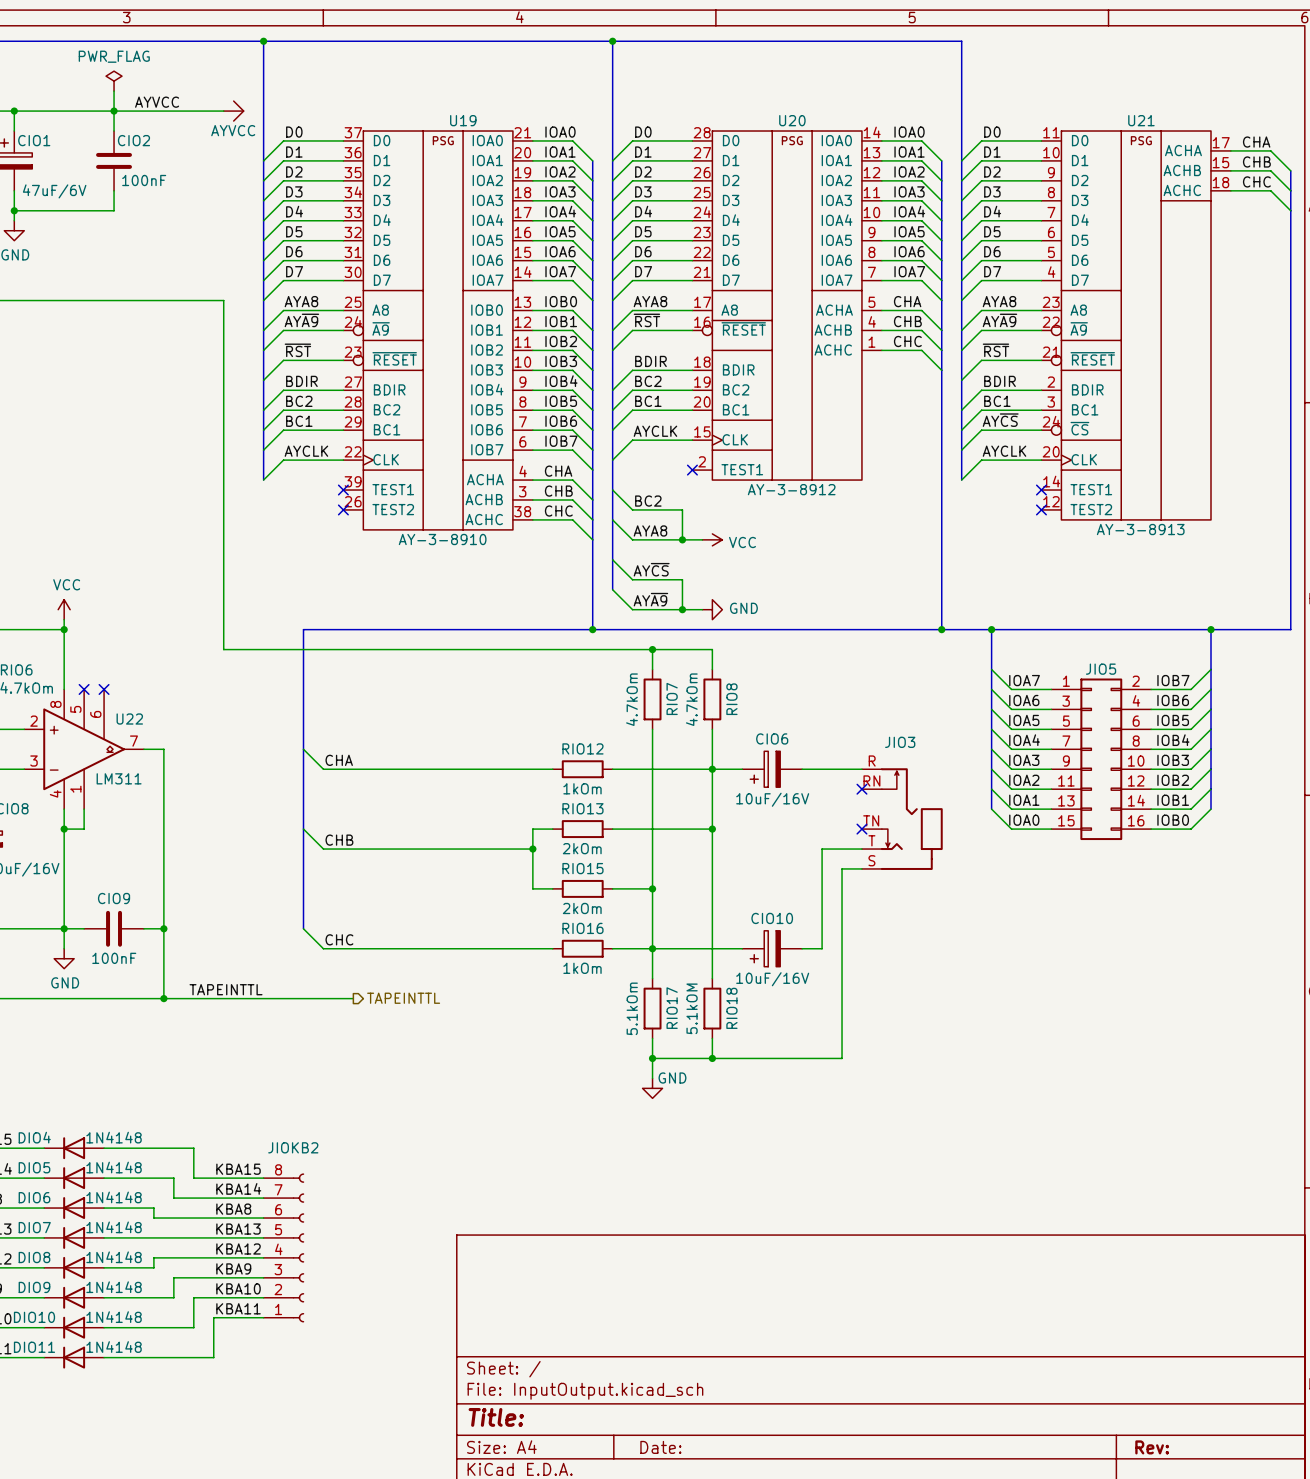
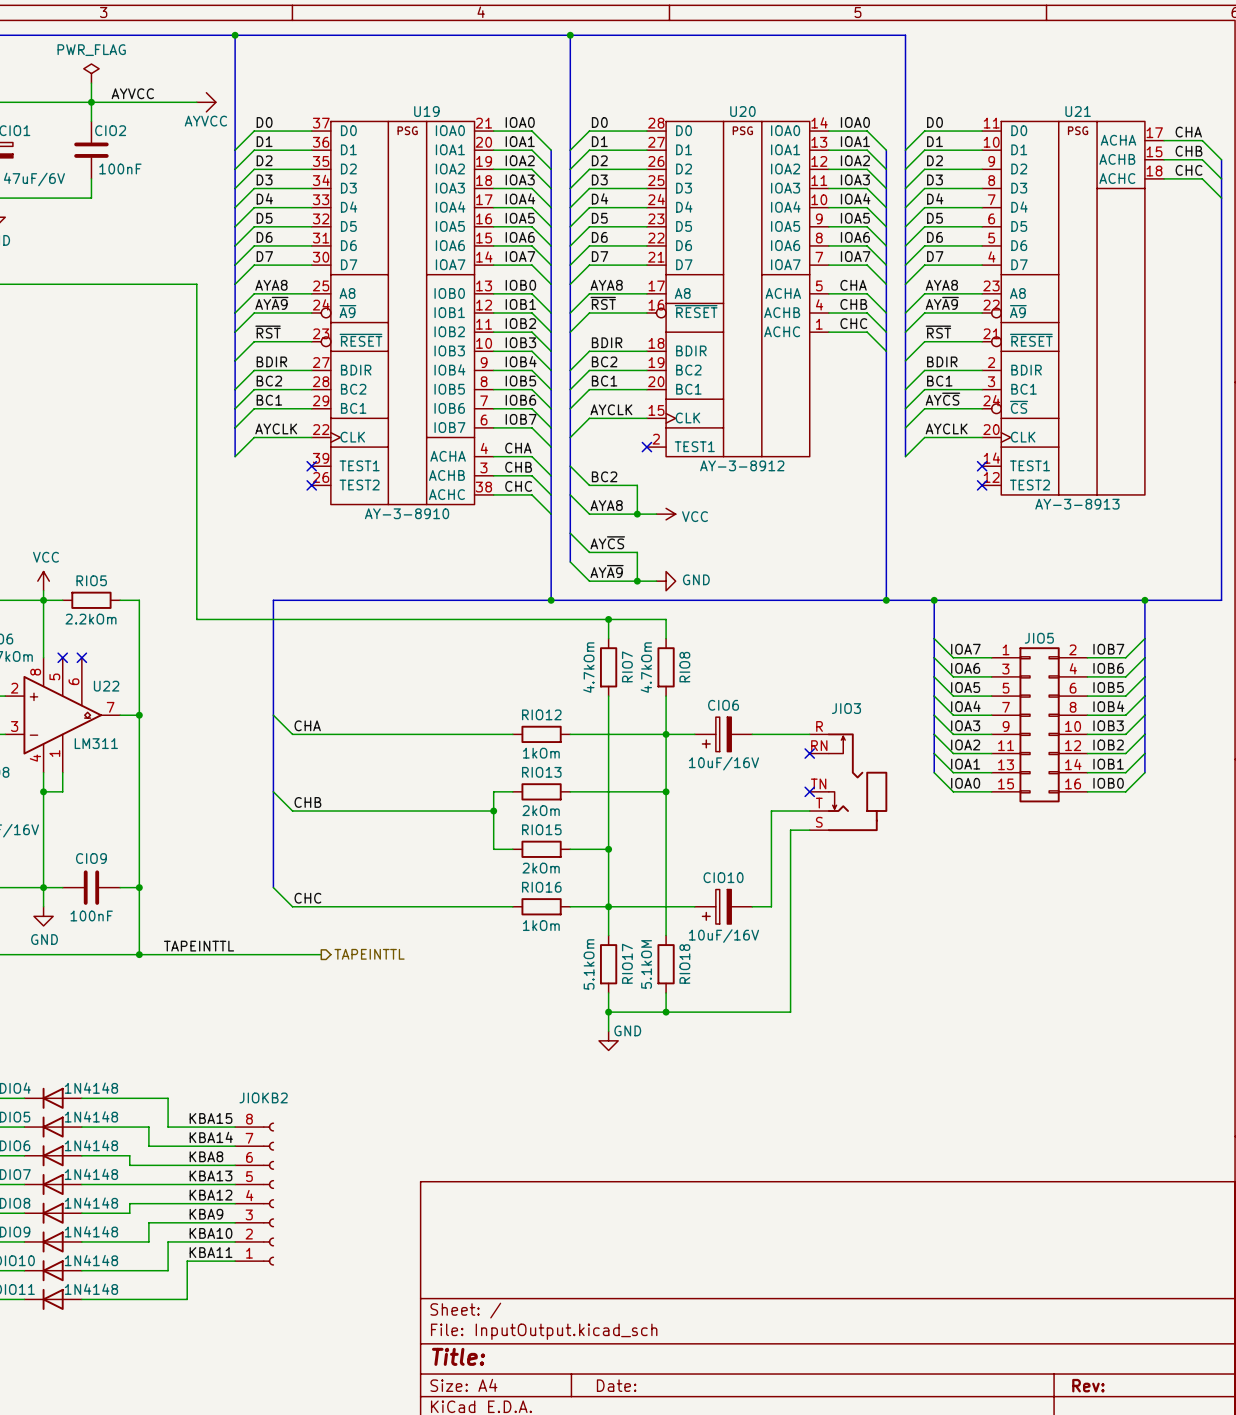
wire: none -> (43, 600) (62, 600)
RIO5: none -> 2.2kOm (91, 600)
wire: none -> (120, 600) (139, 600) (139, 715)
junction: none -> (139, 715)

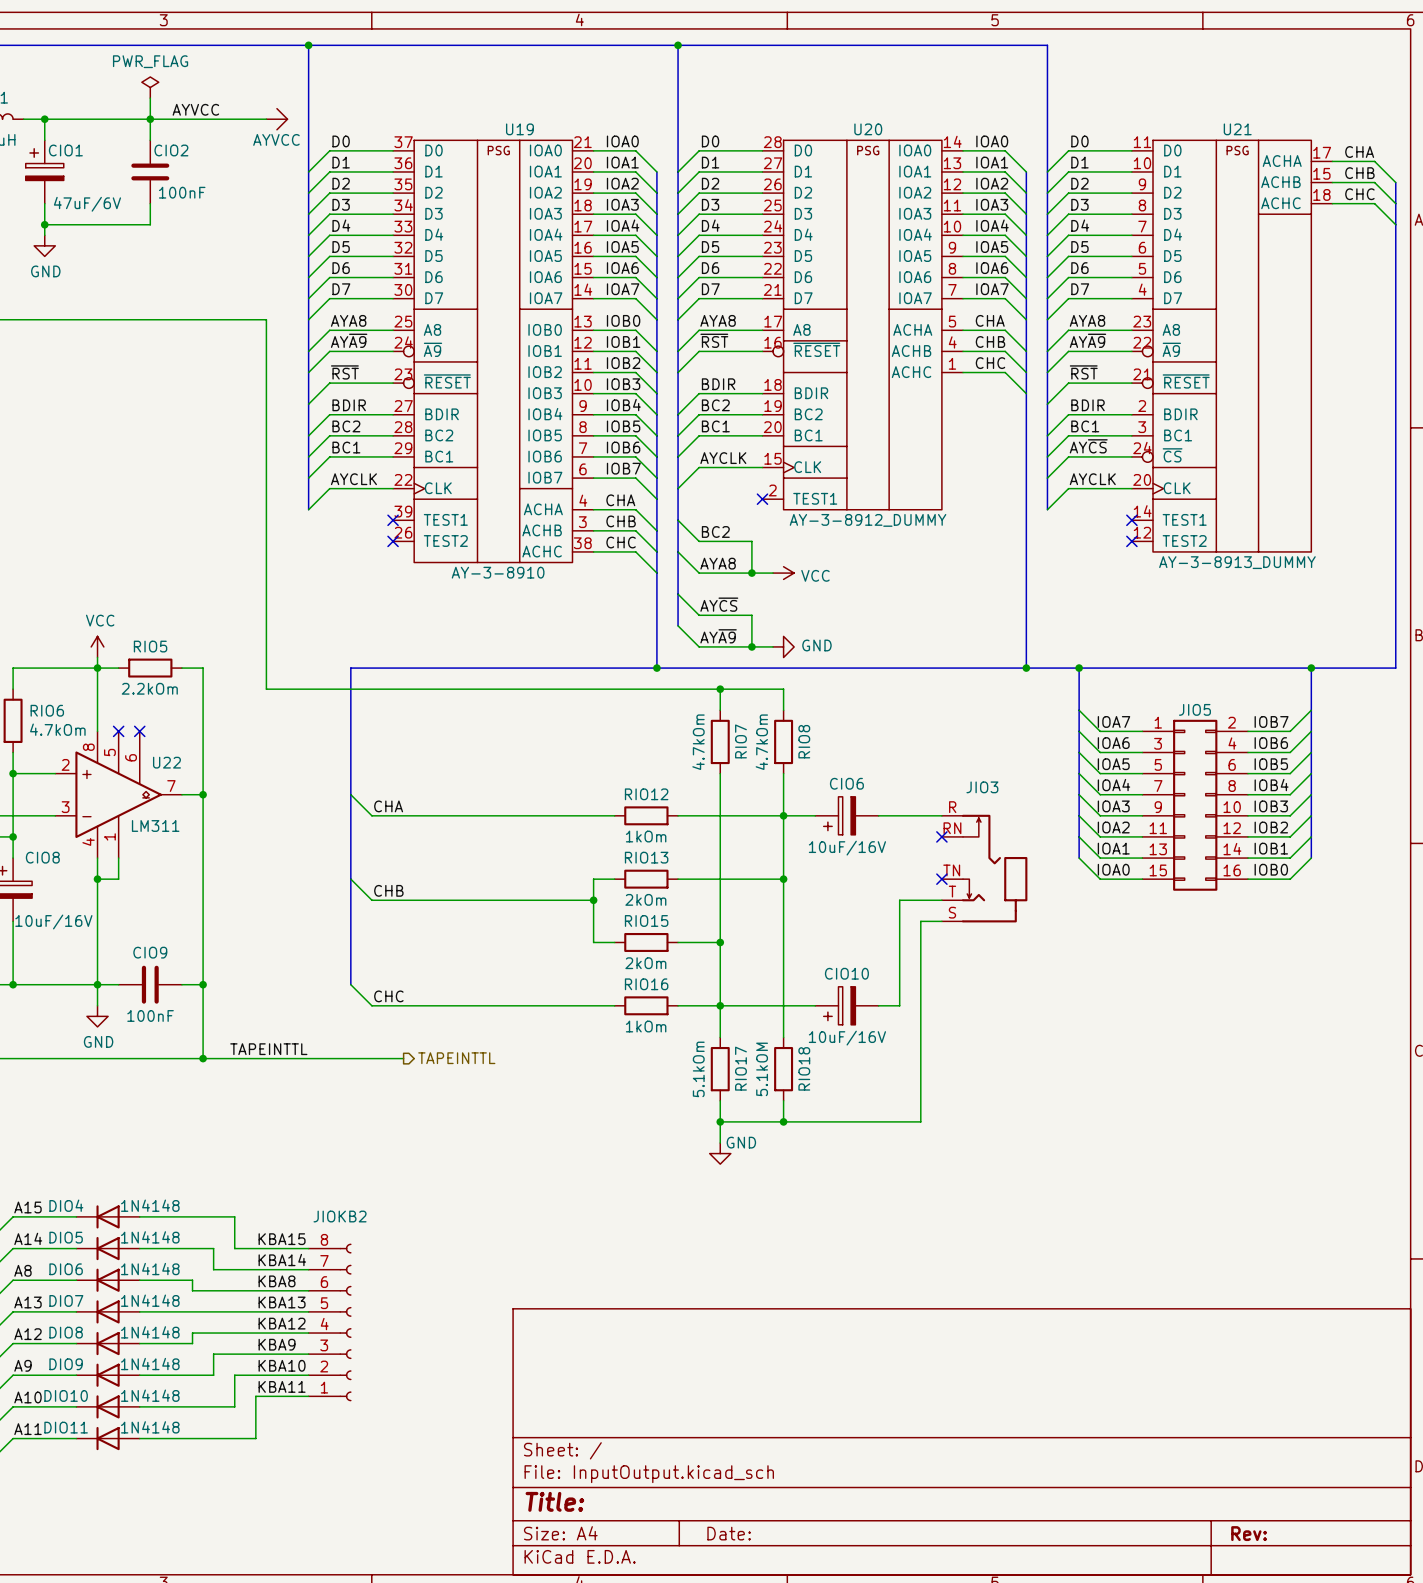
U20 value: AY-3-8912 (742, 465) -> AY-3-8912_DUMMY (868, 520)
U21 value: AY-3-8913 (1077, 504) -> AY-3-8913_DUMMY (1237, 562)

